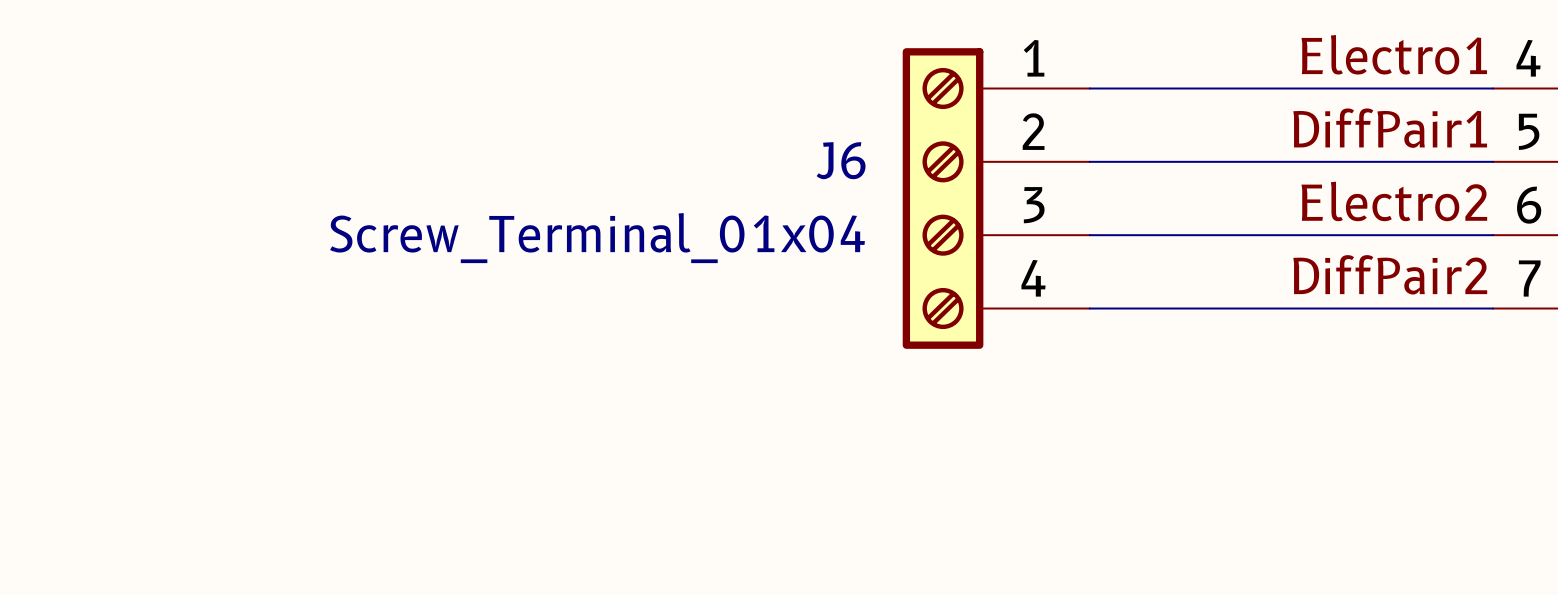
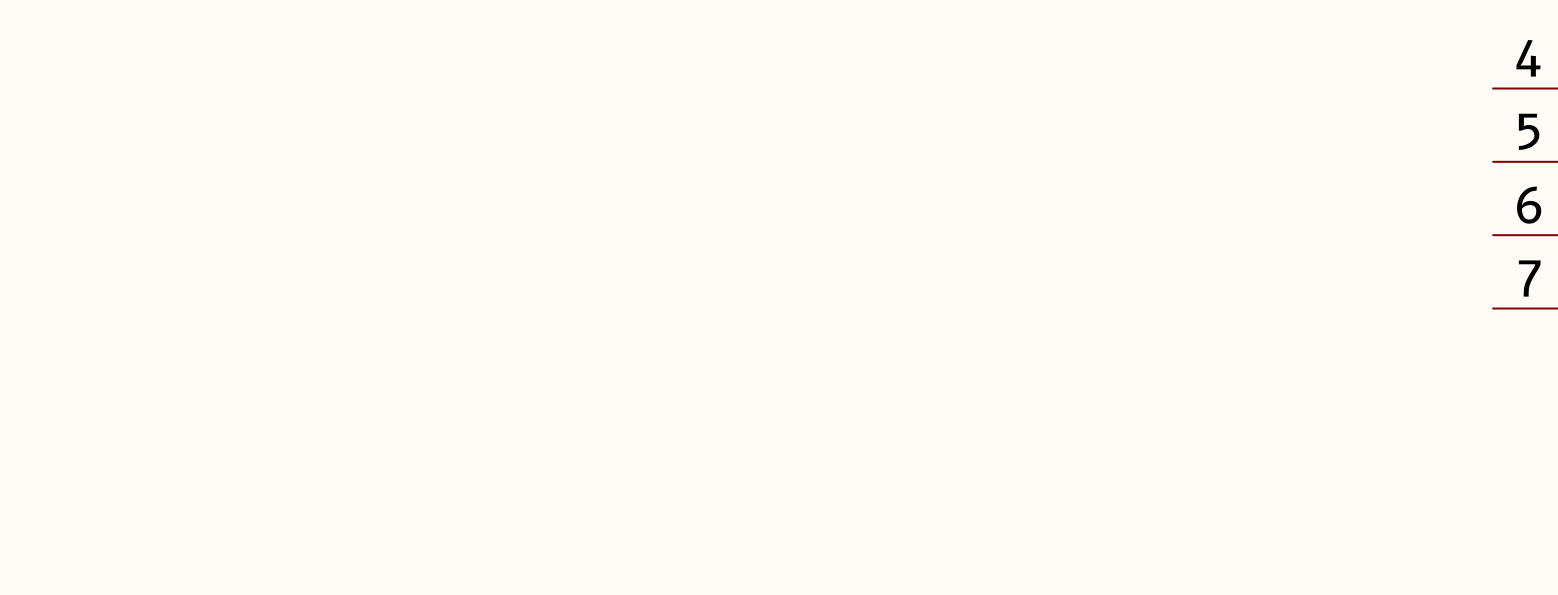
label: Electro1 (1394, 54) -> none
wire: (1089, 88) (1493, 88) -> none
label: DiffPair1 (1390, 128) -> none
wire: (1089, 161) (1493, 161) -> none
J6: Screw_Terminal_01x04 (996, 198) -> none
label: Electro2 (1394, 201) -> none
wire: (1089, 235) (1493, 235) -> none
label: DiffPair2 (1390, 274) -> none
wire: (1089, 308) (1493, 308) -> none

